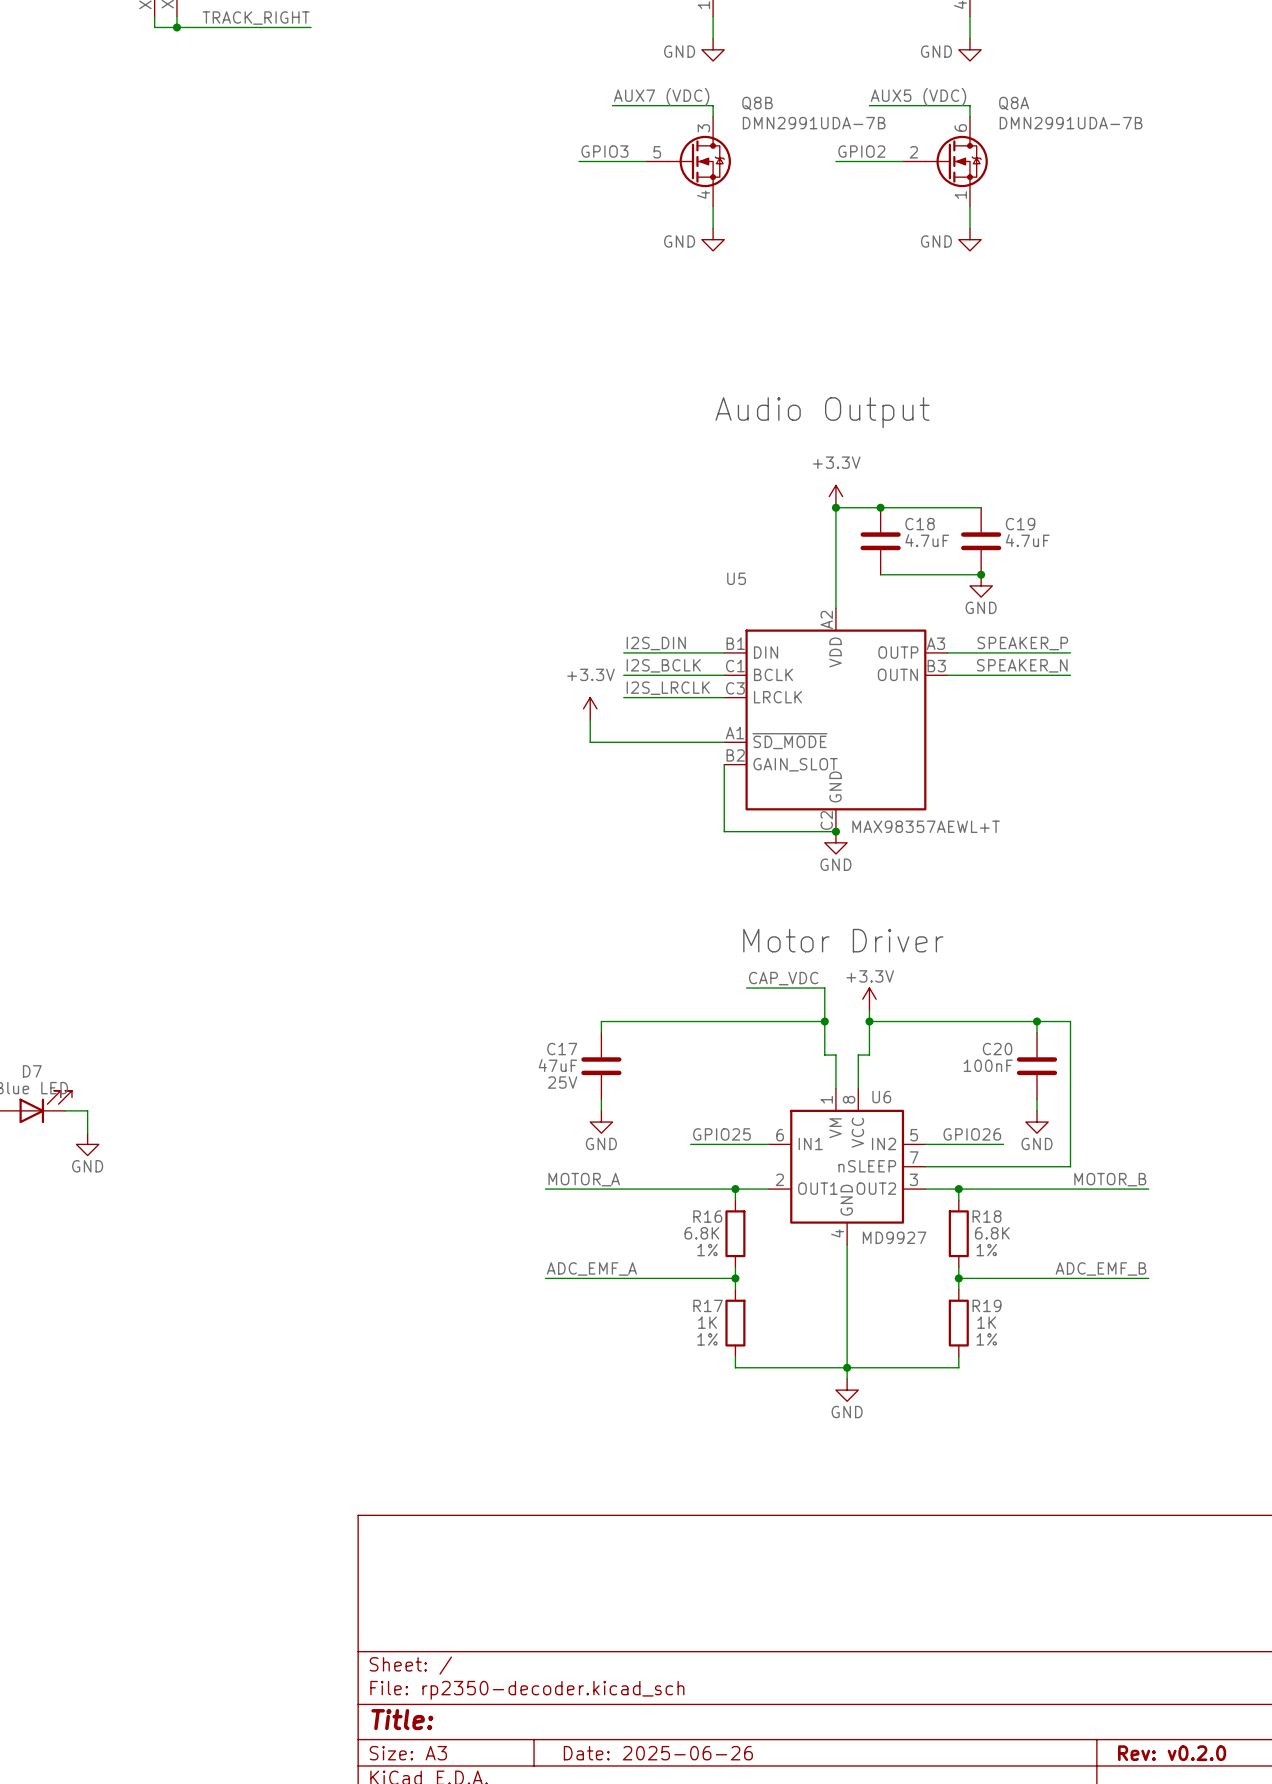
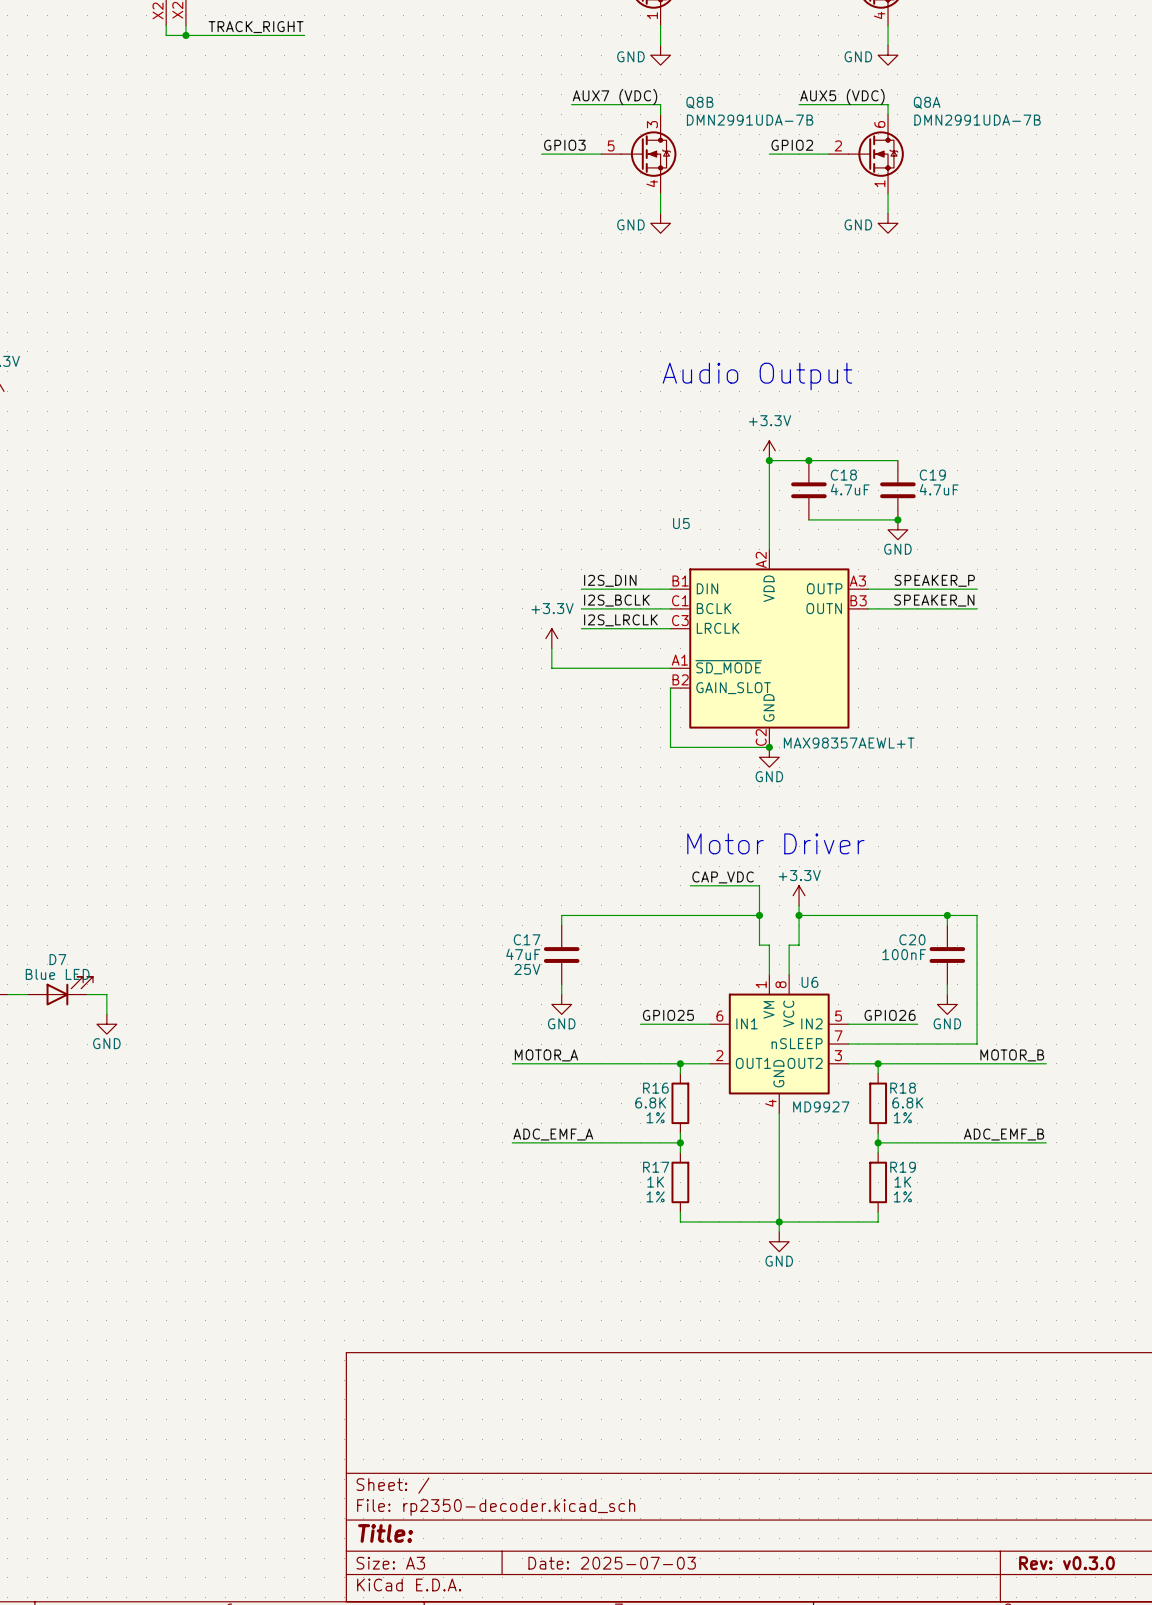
title block: Date: 2025-06-26 (658, 1753) -> Date: 2025-07-03 (612, 1563)
title block: Rev: v0.2.0 (1172, 1753) -> Rev: v0.3.0 (1066, 1563)

